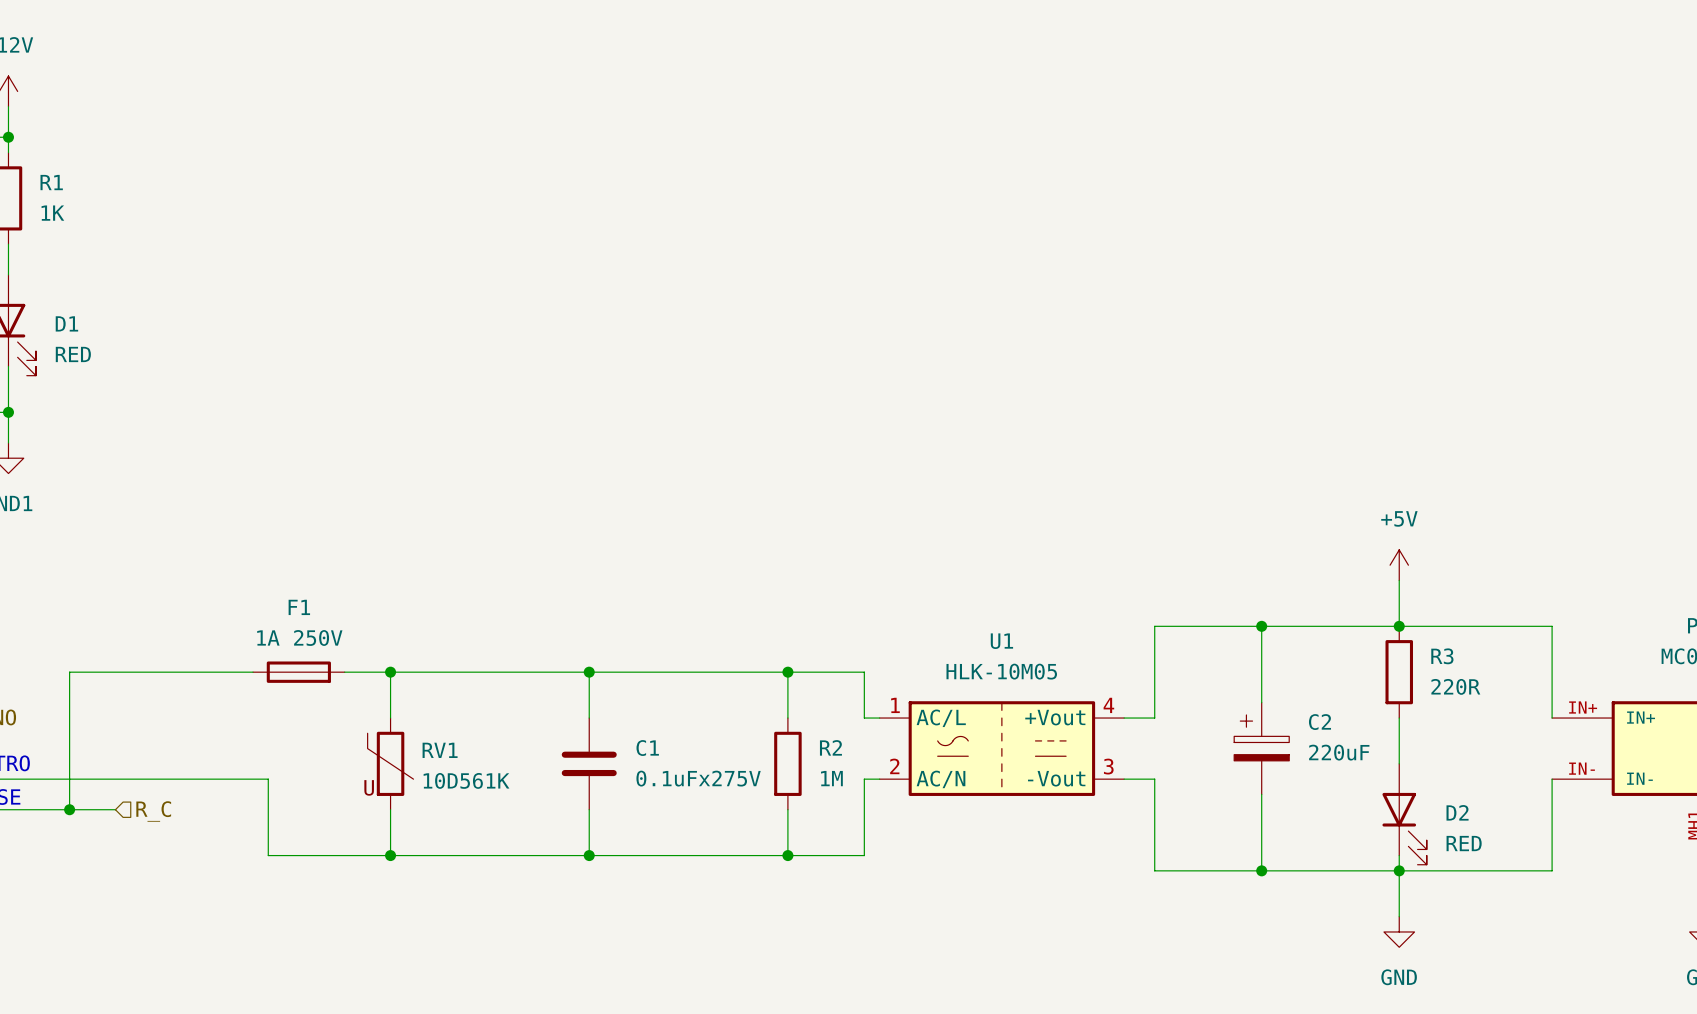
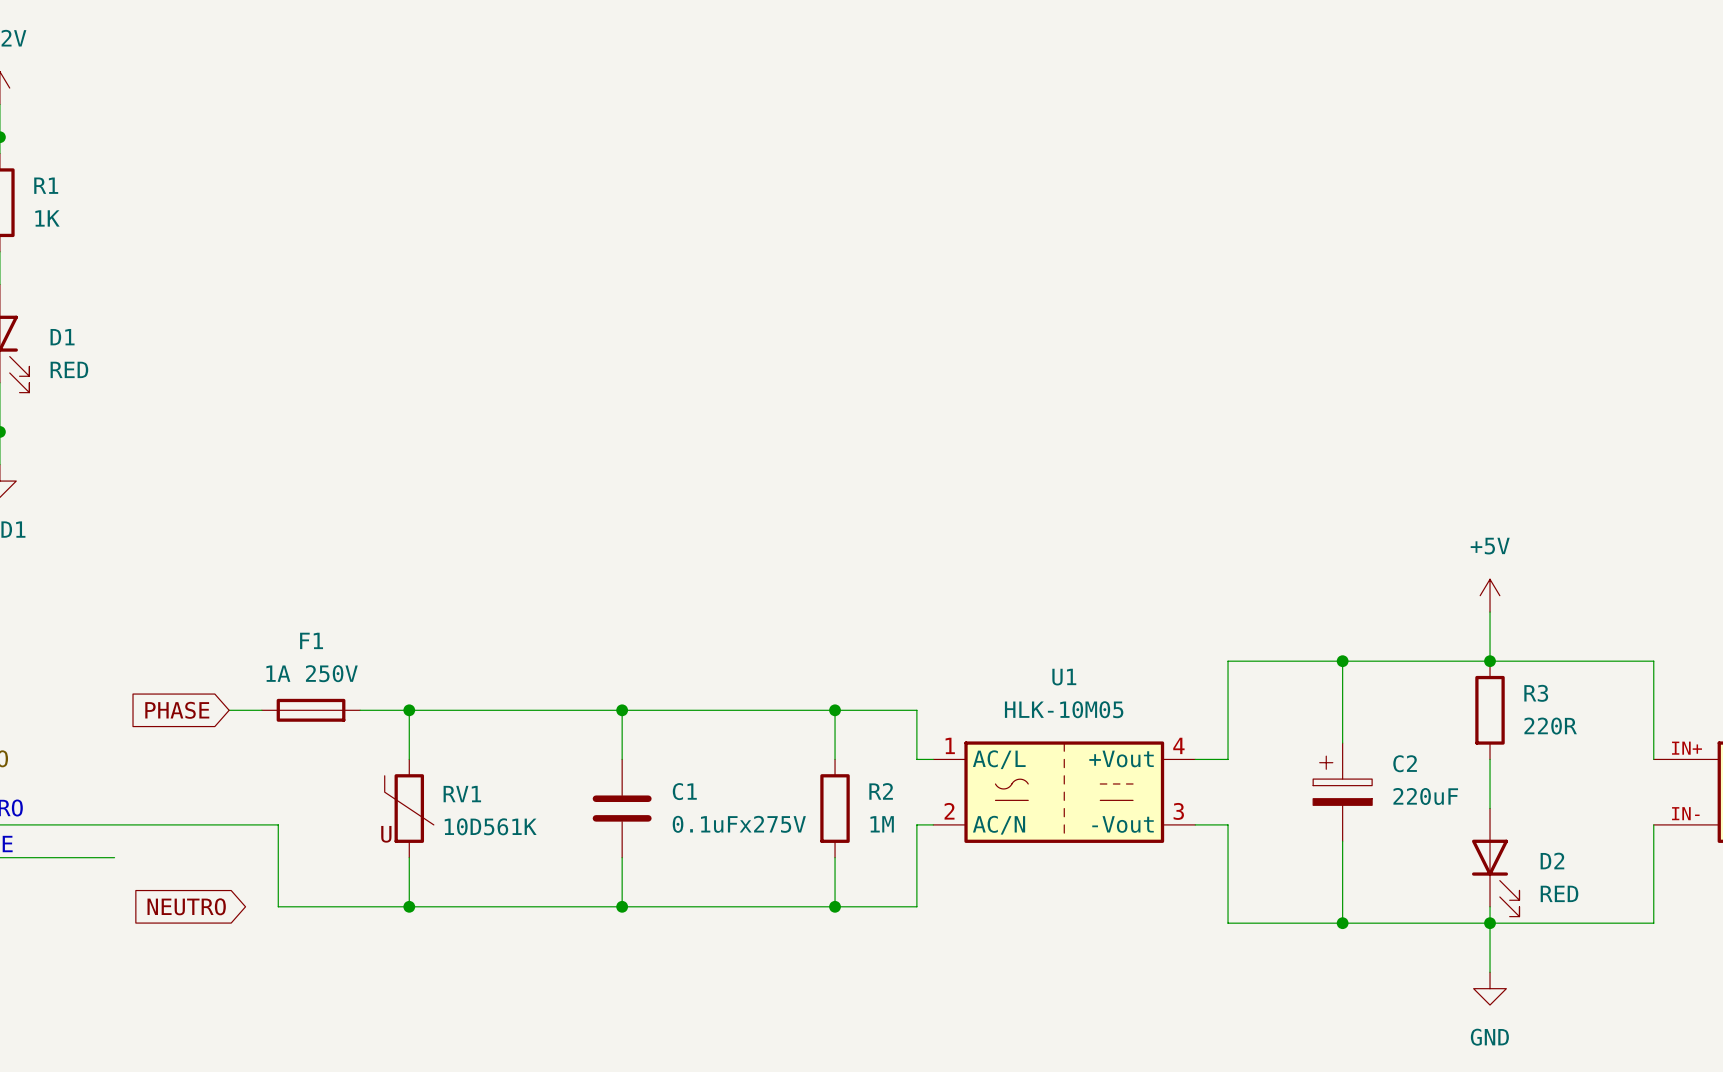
global label: none -> PHASE (177, 710)
wire: (222, 672) (69, 672) (69, 809) -> none
junction: (69, 809) -> none
hierarchical label: R_C (153, 811) -> none
global label: none -> NEUTRO (186, 906)

